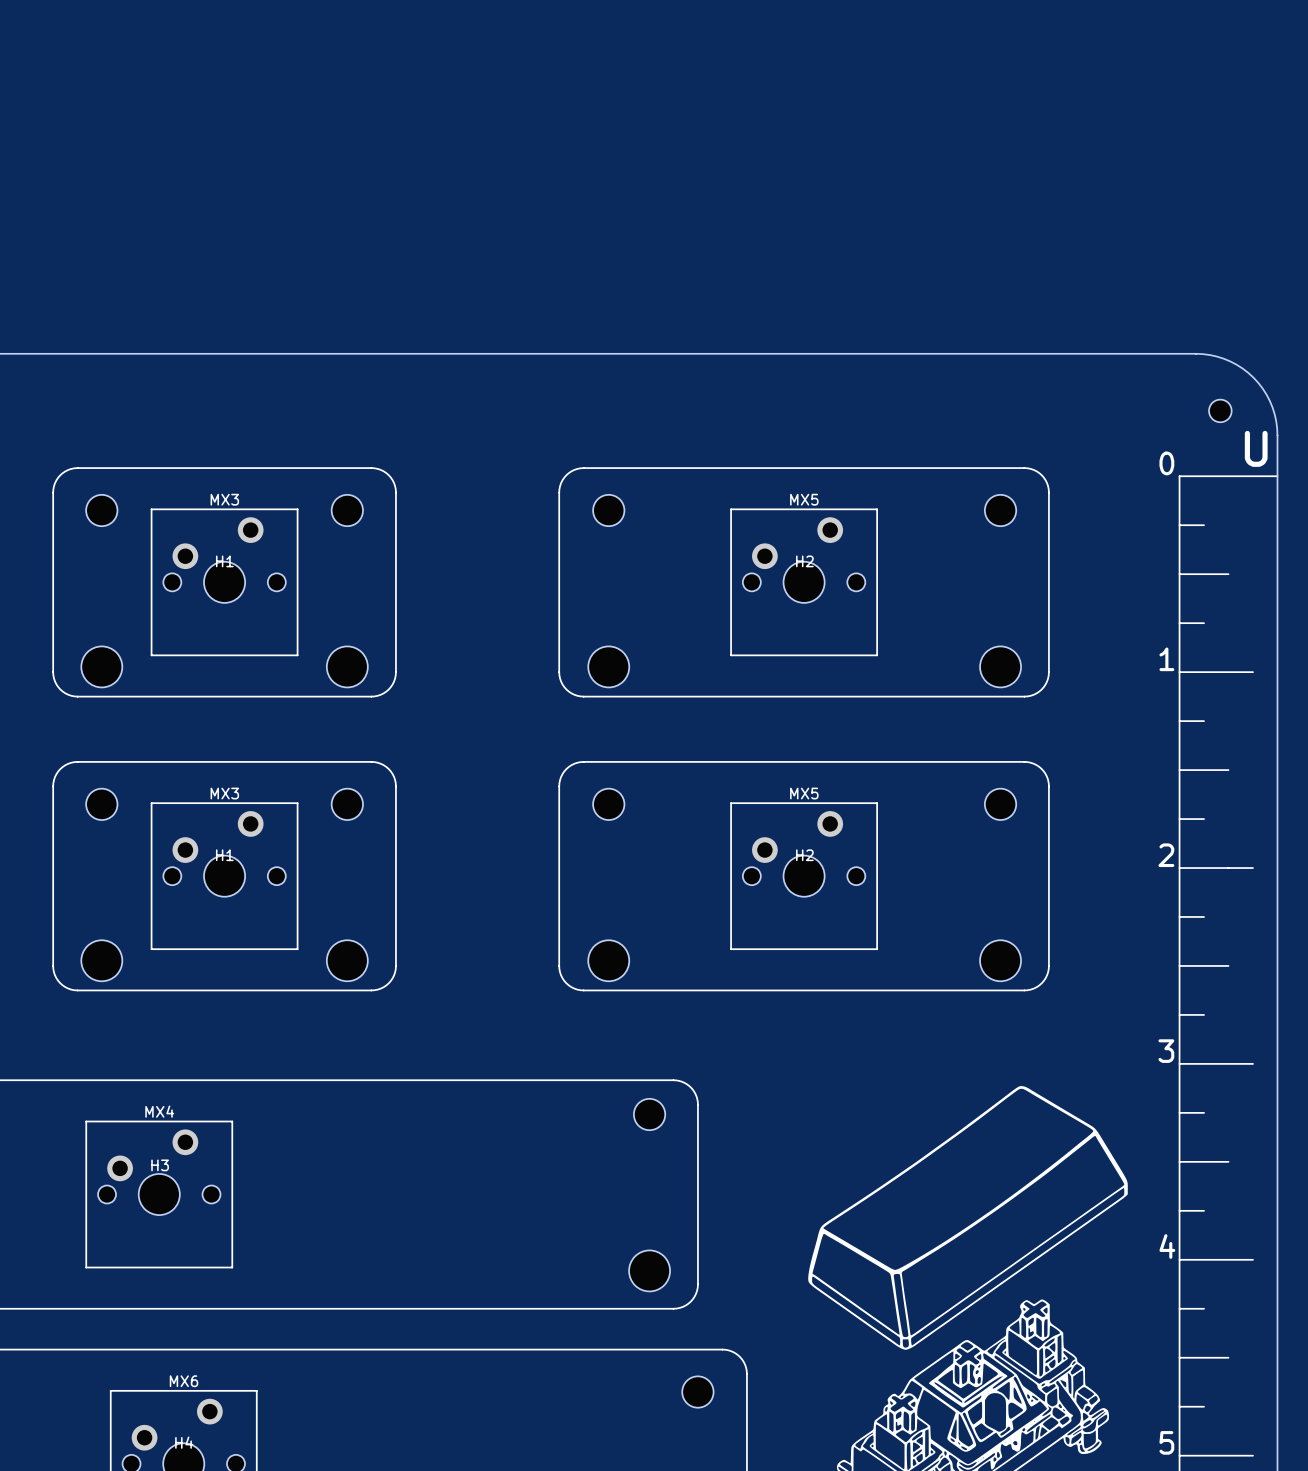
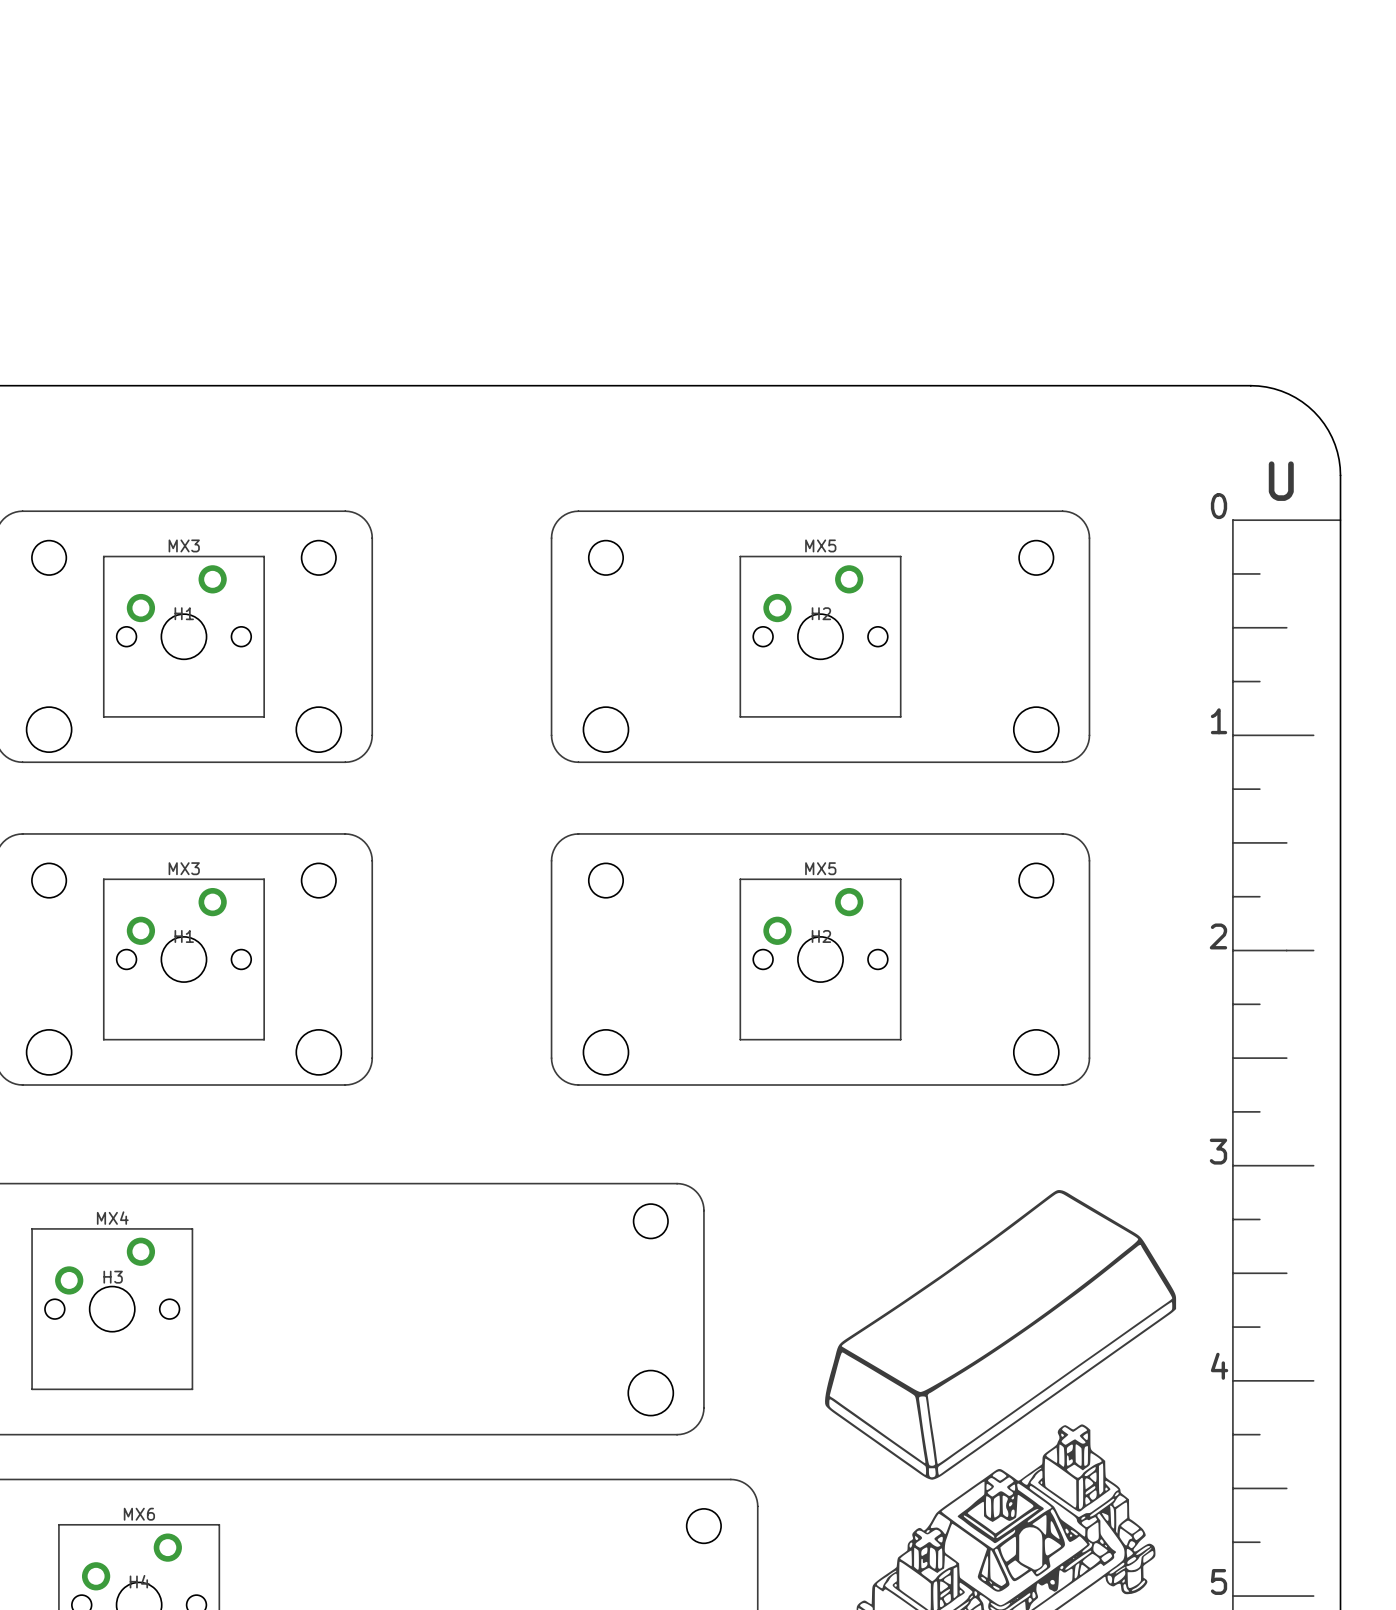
part: (1220, 410) -> none
text position: U (1256, 448) -> U (1281, 481)

